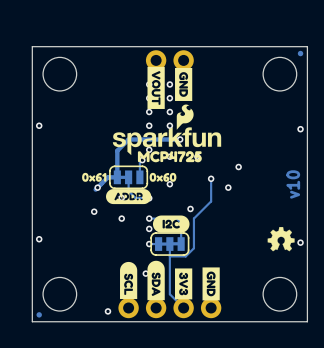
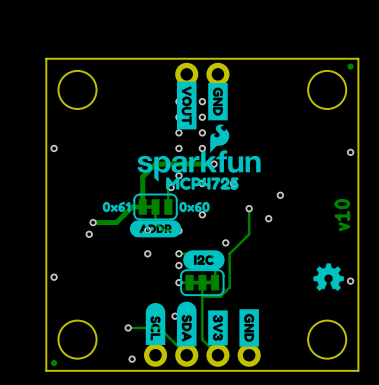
via: (97, 187) -> none
track: none -> (118, 220) (116, 222) (93, 222)
via: none -> (93, 222)
via: none -> (89, 234)
via: (94, 211) -> none
track: none -> (128, 327) (159, 327) (186, 355)
via: none -> (128, 327)

